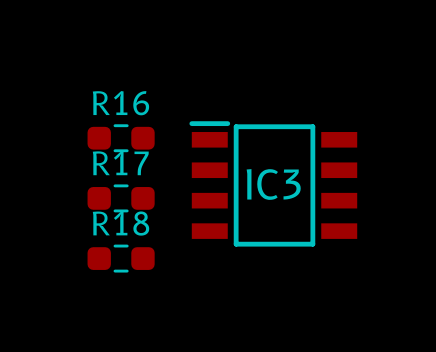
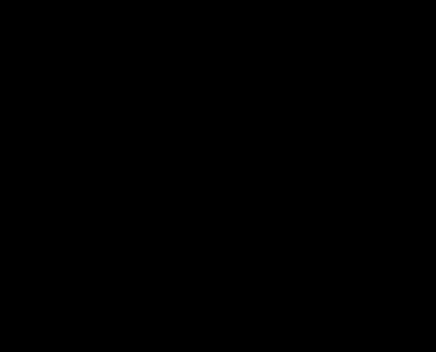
R16: (121, 138) -> none
IC3: (273, 183) -> none
R17: (121, 198) -> none
R18: (121, 258) -> none

